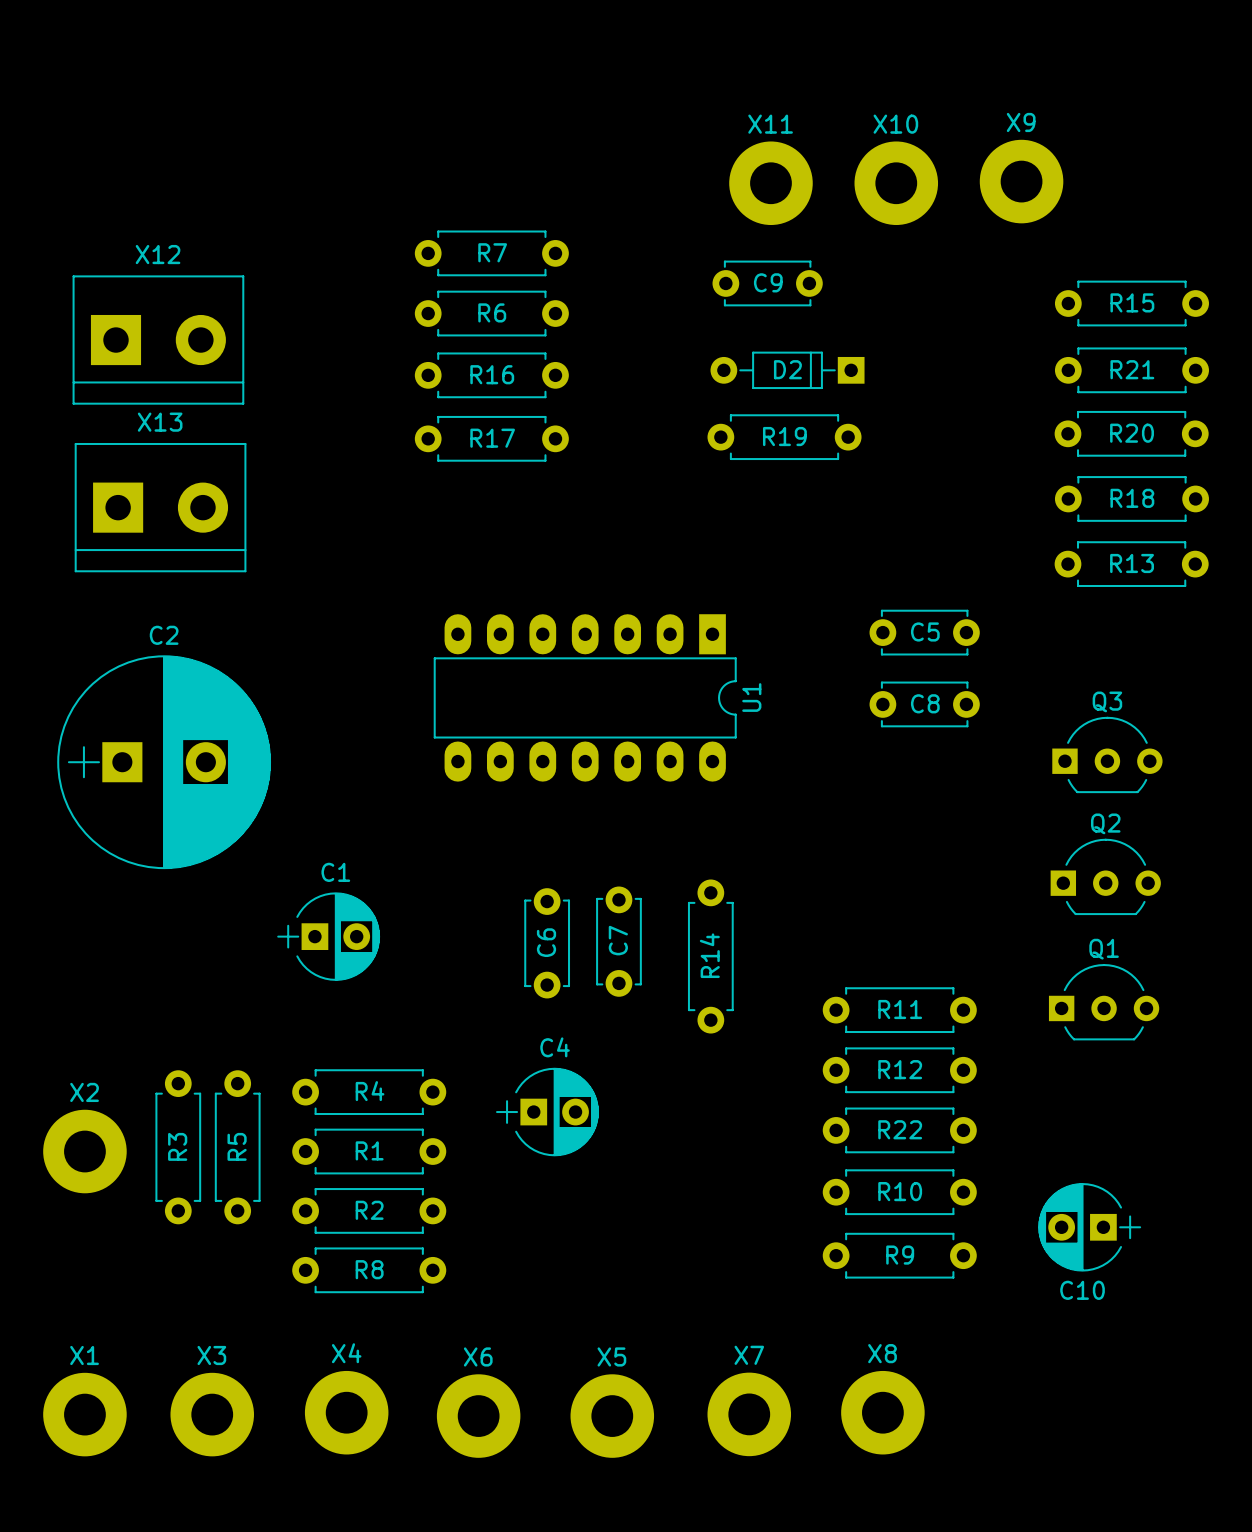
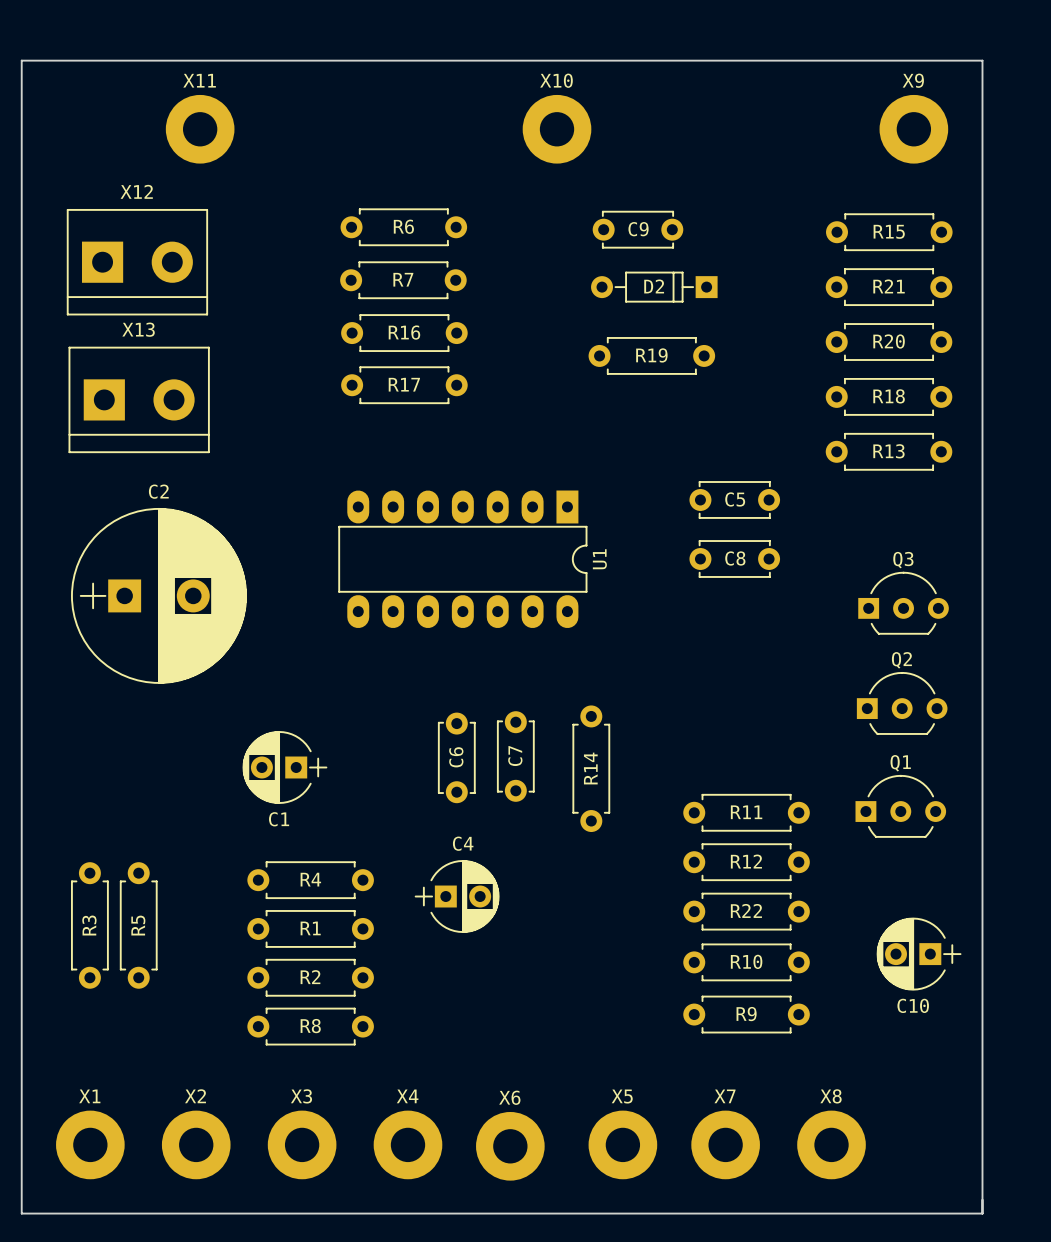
board edge: none -> (21, 60) (982, 60) (982, 1213) (21, 1213) (21, 60)
X9 position: (1021, 181) -> (913, 129)
X11 position: (770, 183) -> (200, 129)
X10 position: (896, 183) -> (557, 129)
R7 position: (491, 253) -> (403, 280)
C9 position: (767, 283) -> (637, 229)
R15 position: (1131, 303) -> (889, 232)
R6 position: (491, 313) -> (403, 227)
R21 position: (1131, 370) -> (889, 287)
R16 position: (491, 375) -> (404, 333)
R20 position: (1131, 433) -> (889, 342)
R19 position: (784, 437) -> (651, 355)
R17 position: (491, 438) -> (404, 385)
R18 position: (1131, 498) -> (889, 396)
R13 position: (1131, 564) -> (889, 451)
C5 position: (924, 632) -> (734, 499)
U1 position: (585, 697) -> (462, 559)
C8 position: (924, 704) -> (734, 559)
Q3 position: (1107, 754) -> (903, 603)
C2 position: (164, 762) -> (158, 595)
Q2 position: (1105, 876) -> (902, 703)
C1 rotation: 0° (328, 936) -> 180° (284, 767)
Q1 position: (1104, 1002) -> (900, 806)
R3 position: (178, 1147) -> (89, 925)
R5 position: (237, 1147) -> (138, 925)
X2 position: (84, 1151) -> (196, 1144)
C10 position: (1089, 1227) -> (919, 954)
X7 name: X7 (749, 1355) -> X5 (622, 1096)
X5 name: X5 (611, 1356) -> X6 (509, 1097)
X4 position: (346, 1412) -> (407, 1144)
X8 position: (882, 1412) -> (831, 1144)
X1 position: (84, 1414) -> (90, 1144)
X3 position: (212, 1414) -> (302, 1144)
X7: none -> (725, 1144)
X6: (478, 1416) -> none

